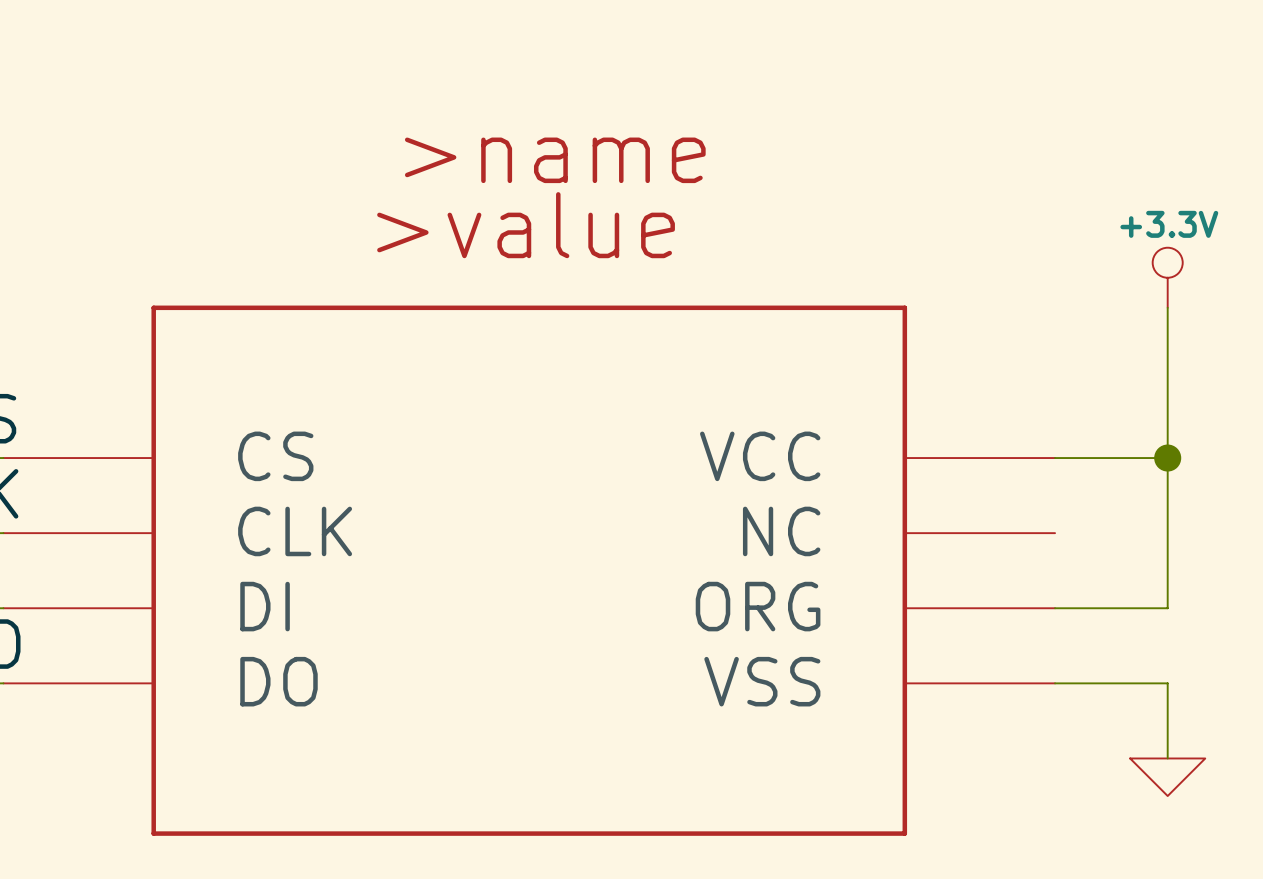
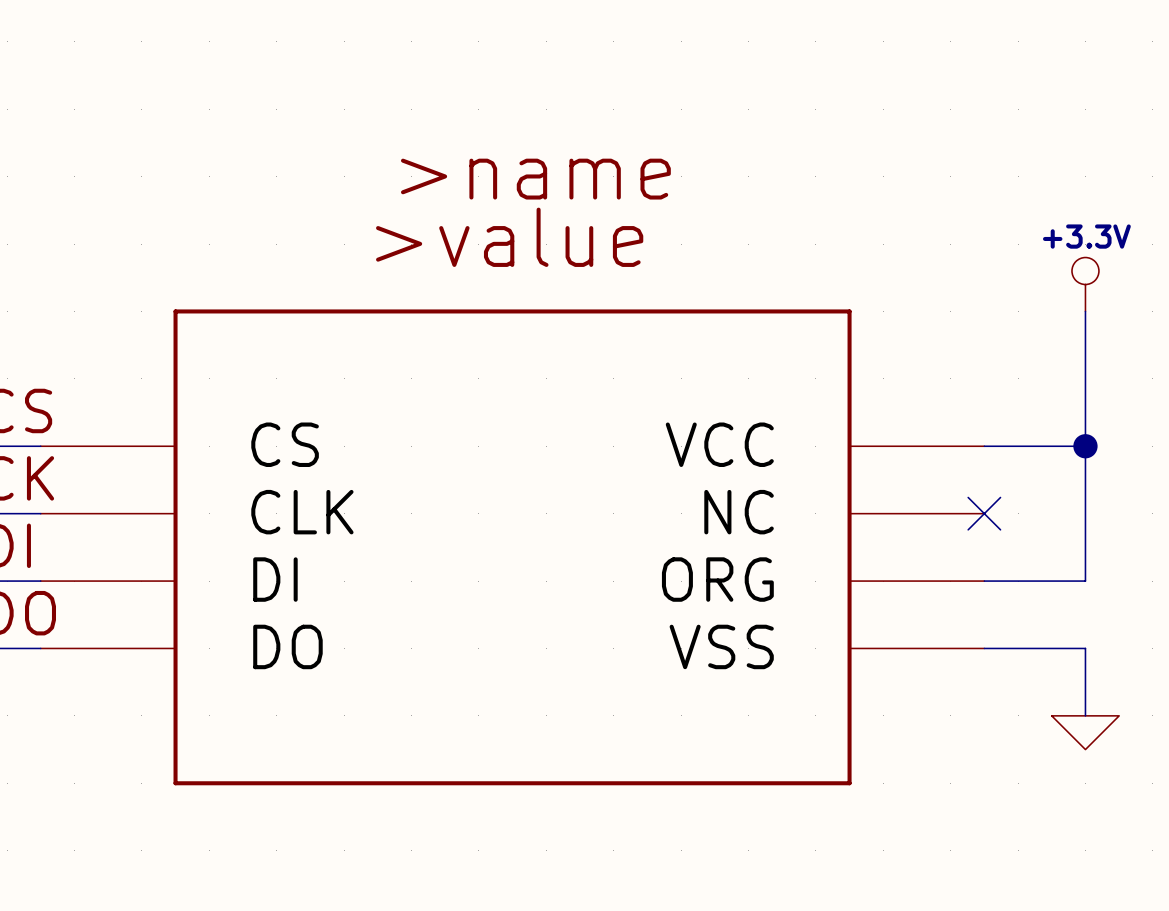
no-connect mark: none -> (984, 513)

